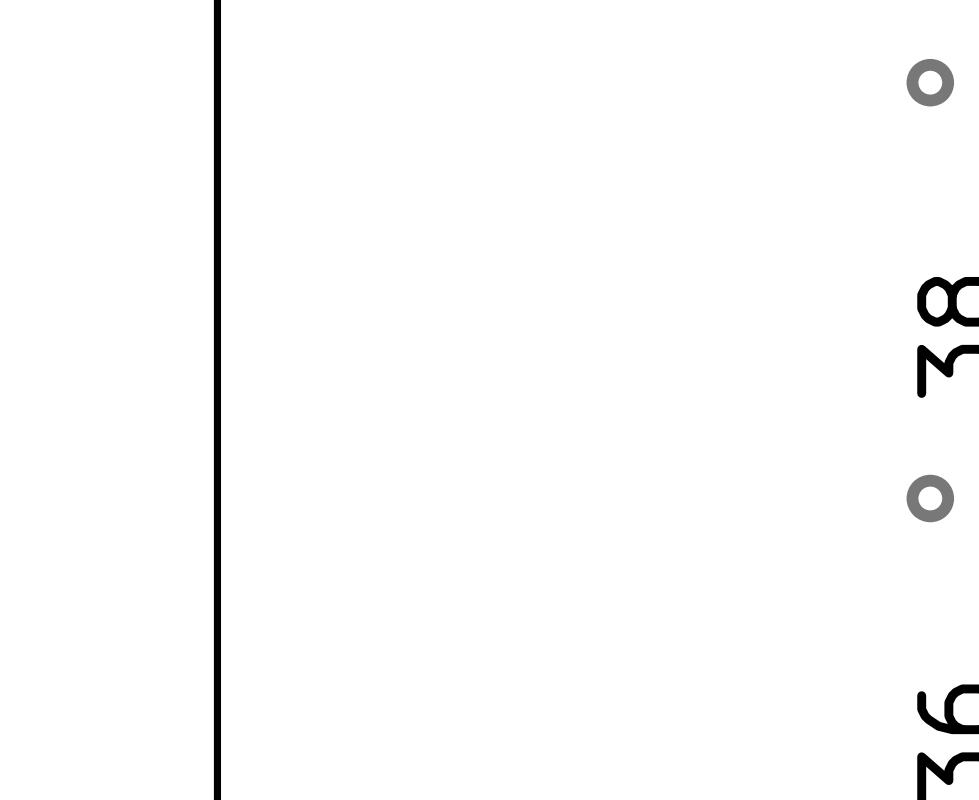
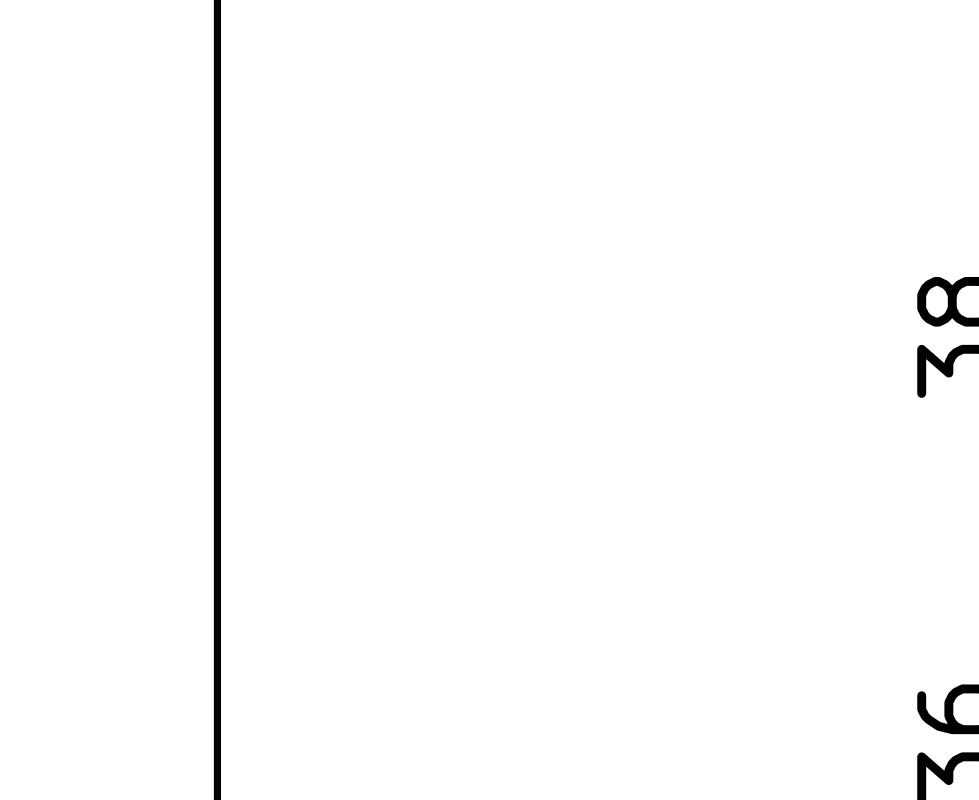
via: (930, 82) -> none
via: (930, 498) -> none

